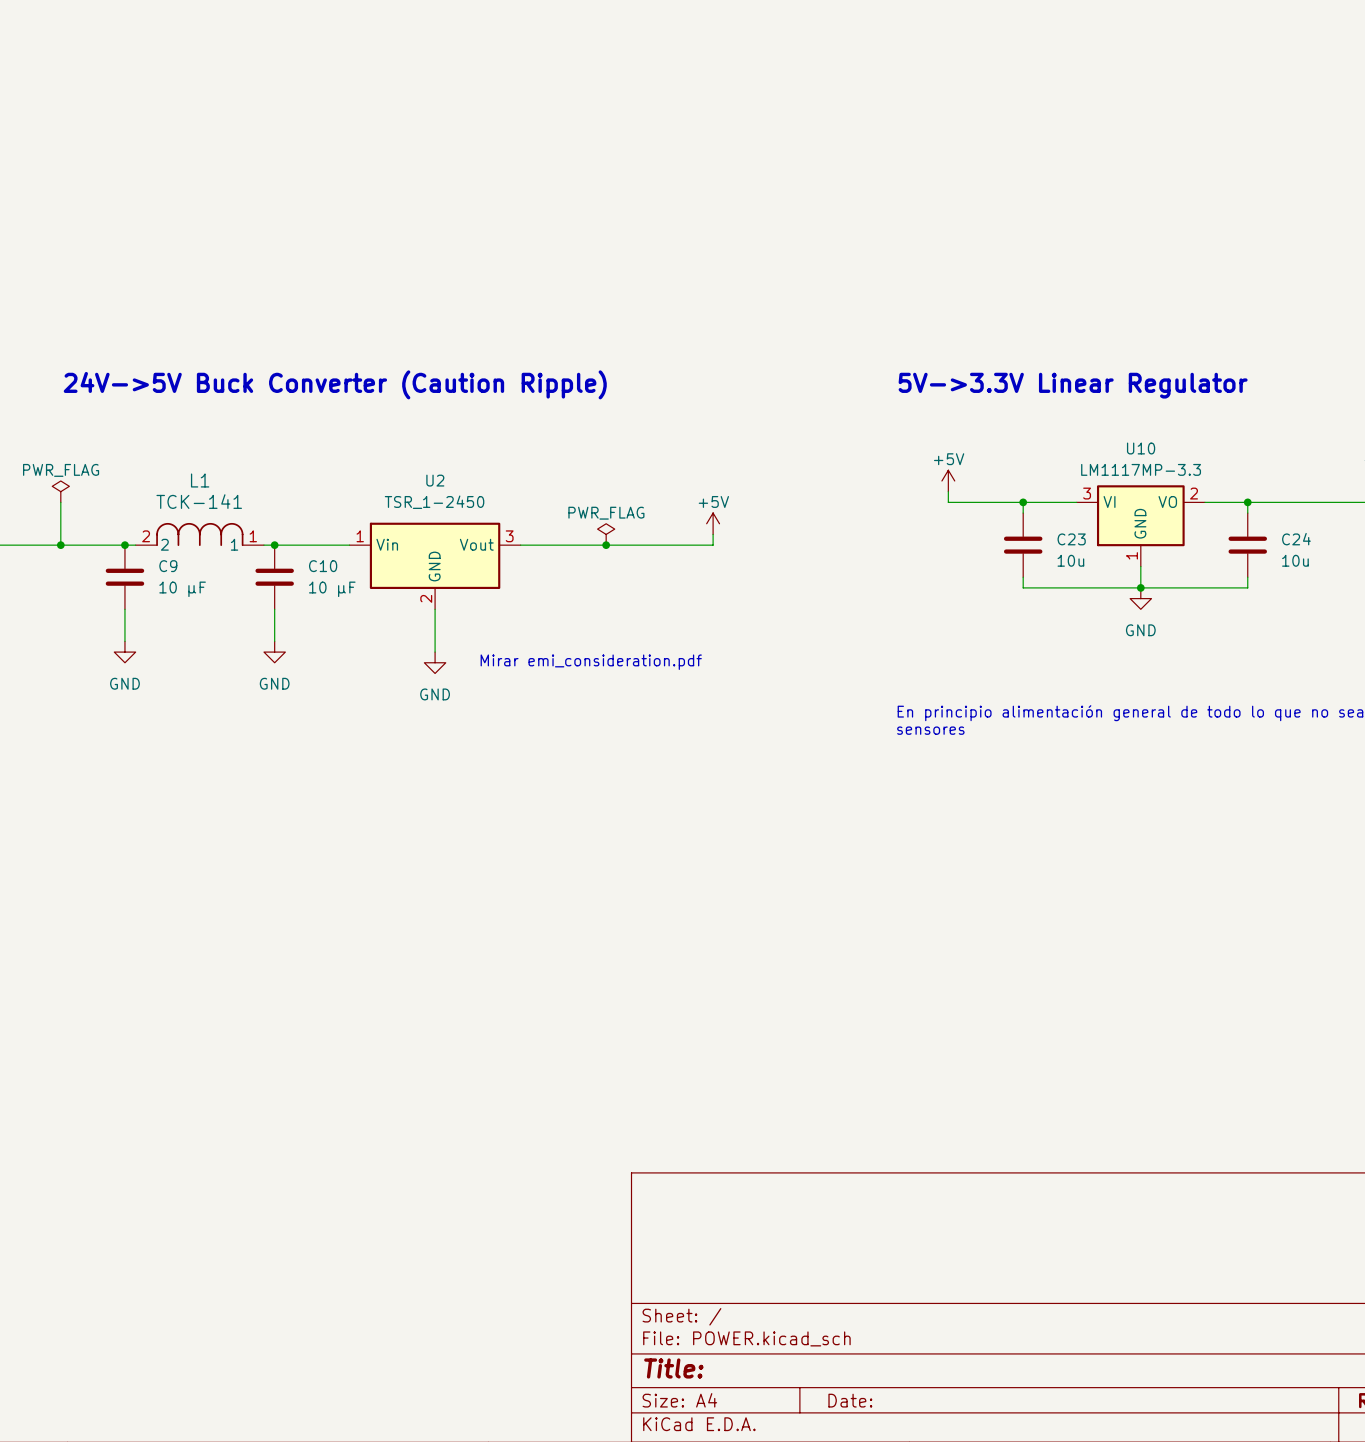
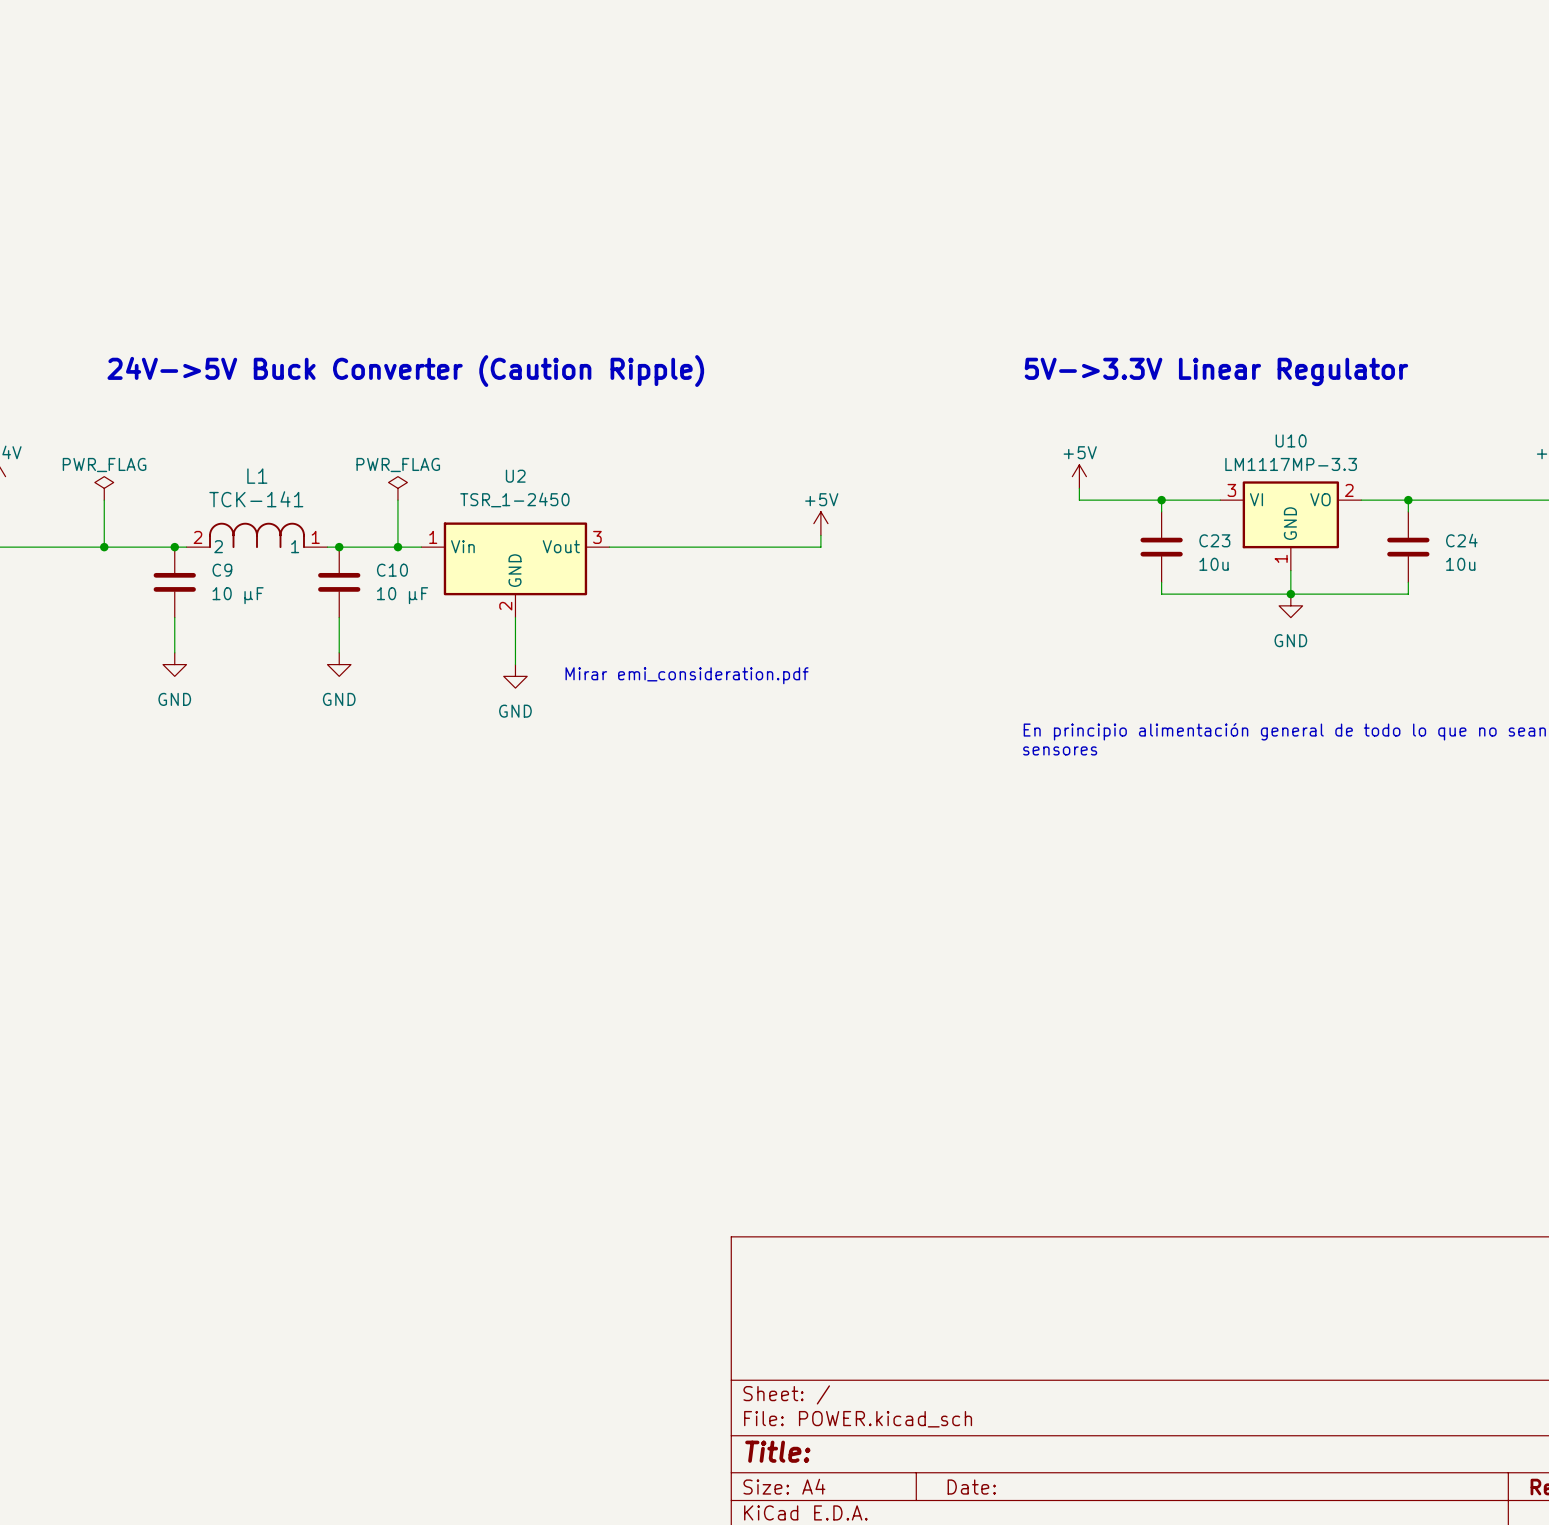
power symbol: none -> PWR_FLAG (397, 488)
wire: none -> (397, 500) (397, 547)
power symbol: PWR_FLAG (606, 534) -> none
junction: none -> (397, 547)
junction: (606, 545) -> none

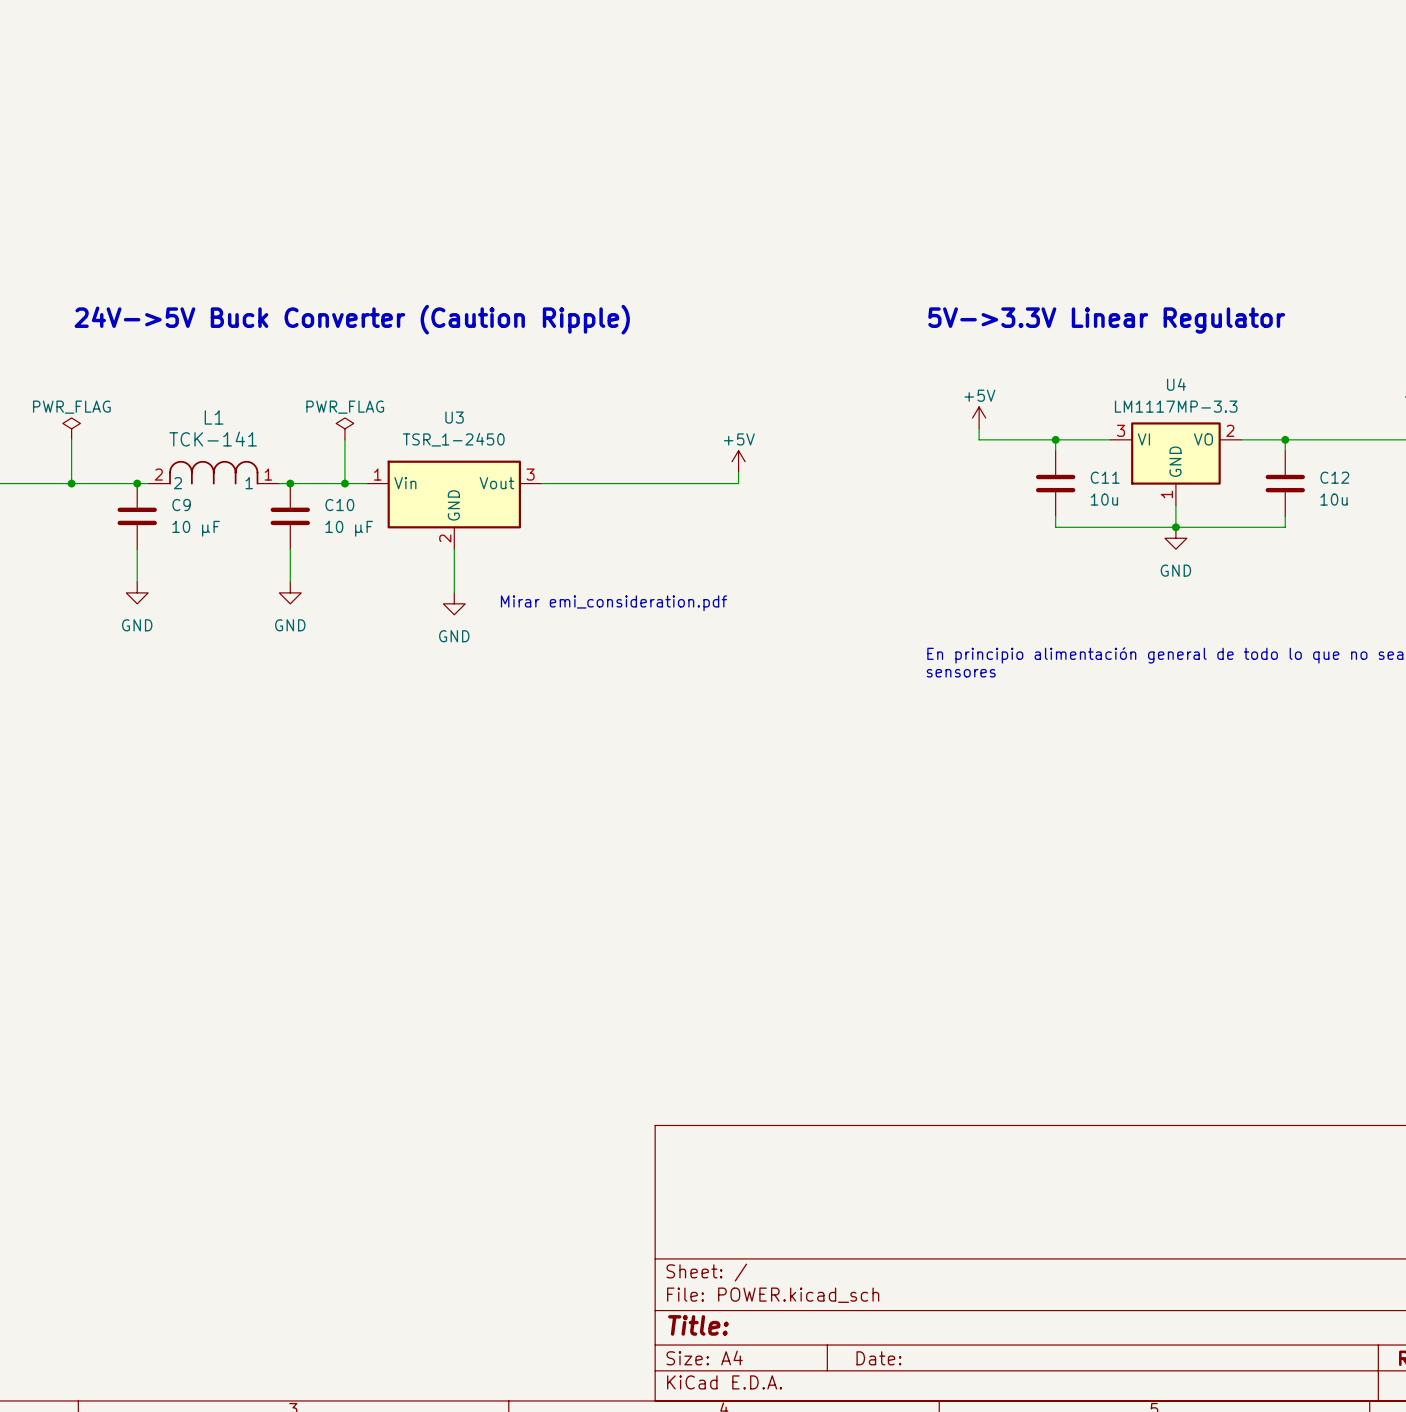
U10 name: U10 (1291, 440) -> U4 (1176, 384)
U2 name: U2 (515, 476) -> U3 (454, 417)
C23 name: C23 (1214, 540) -> C11 (1105, 477)
C24 name: C24 (1461, 540) -> C12 (1334, 477)

